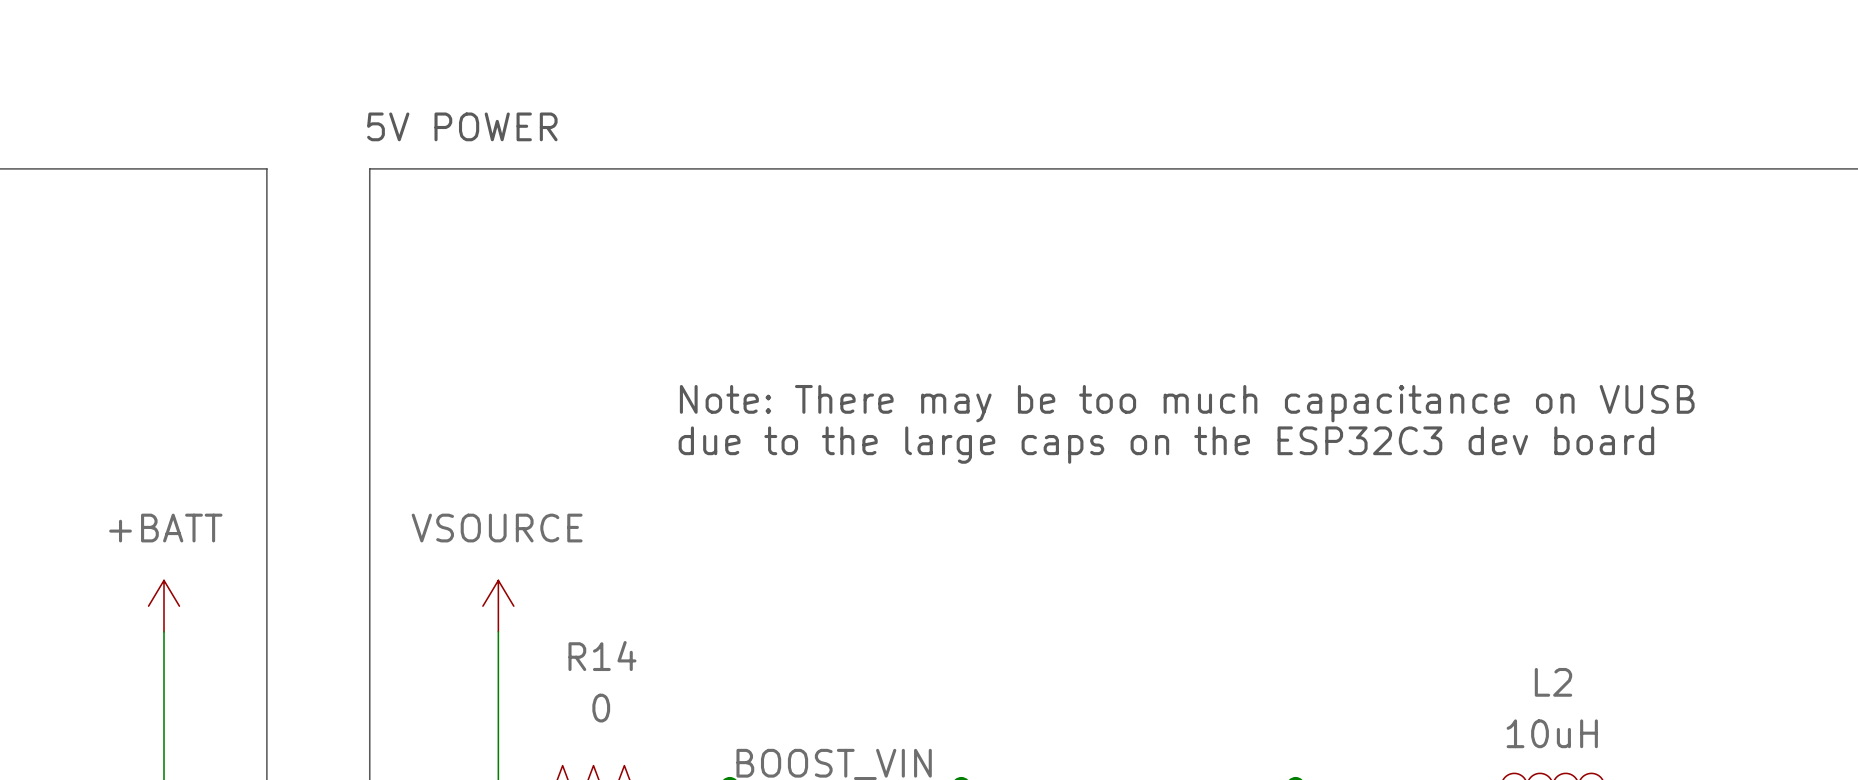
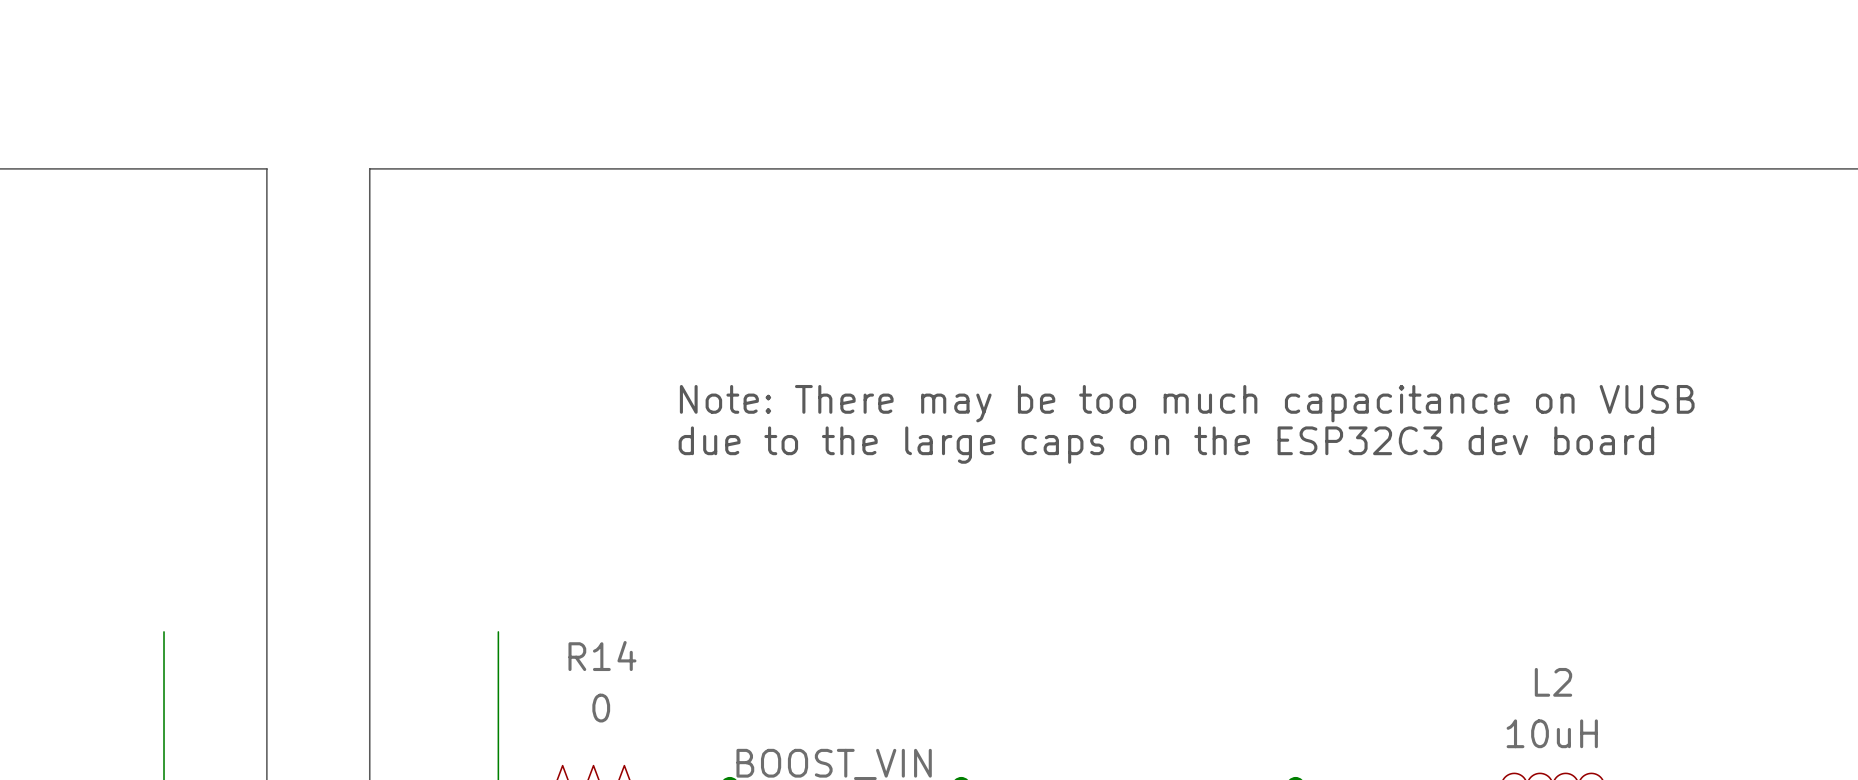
text: 5V POWER (462, 126) -> none
power symbol: +BATT (164, 606) -> none
power symbol: VSOURCE (498, 606) -> none

